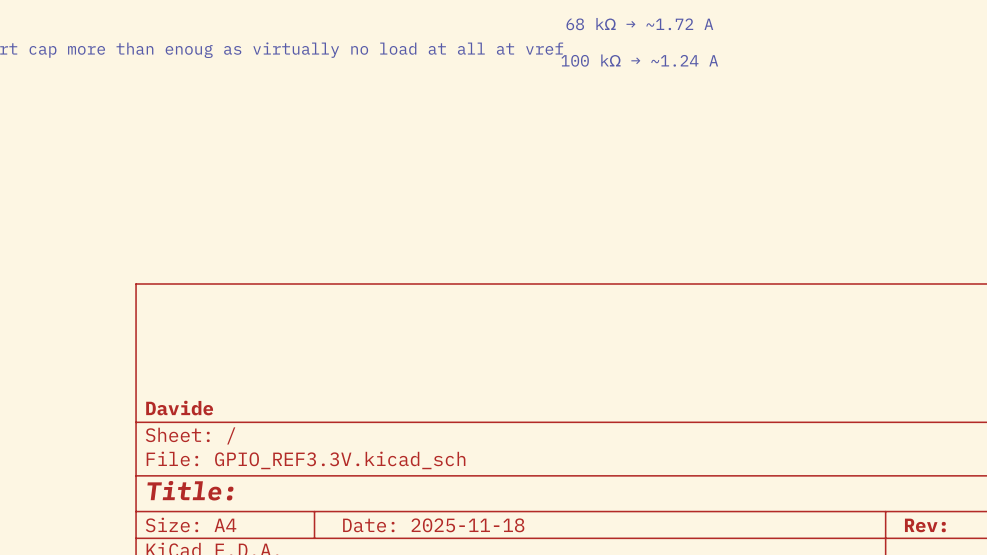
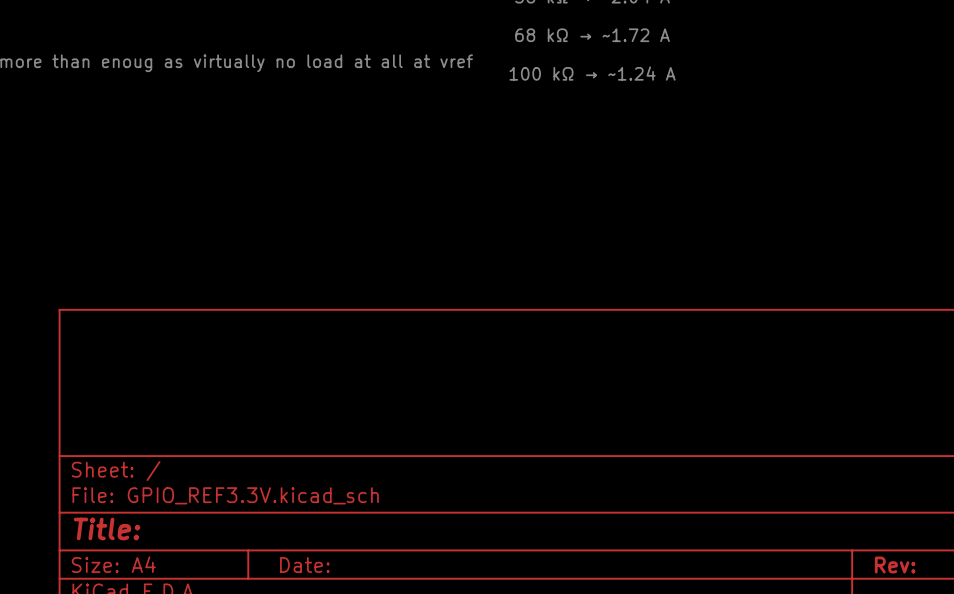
title block: Davide (179, 408) -> none
title block: Date: 2025-11-18 (433, 525) -> Date: (304, 564)

